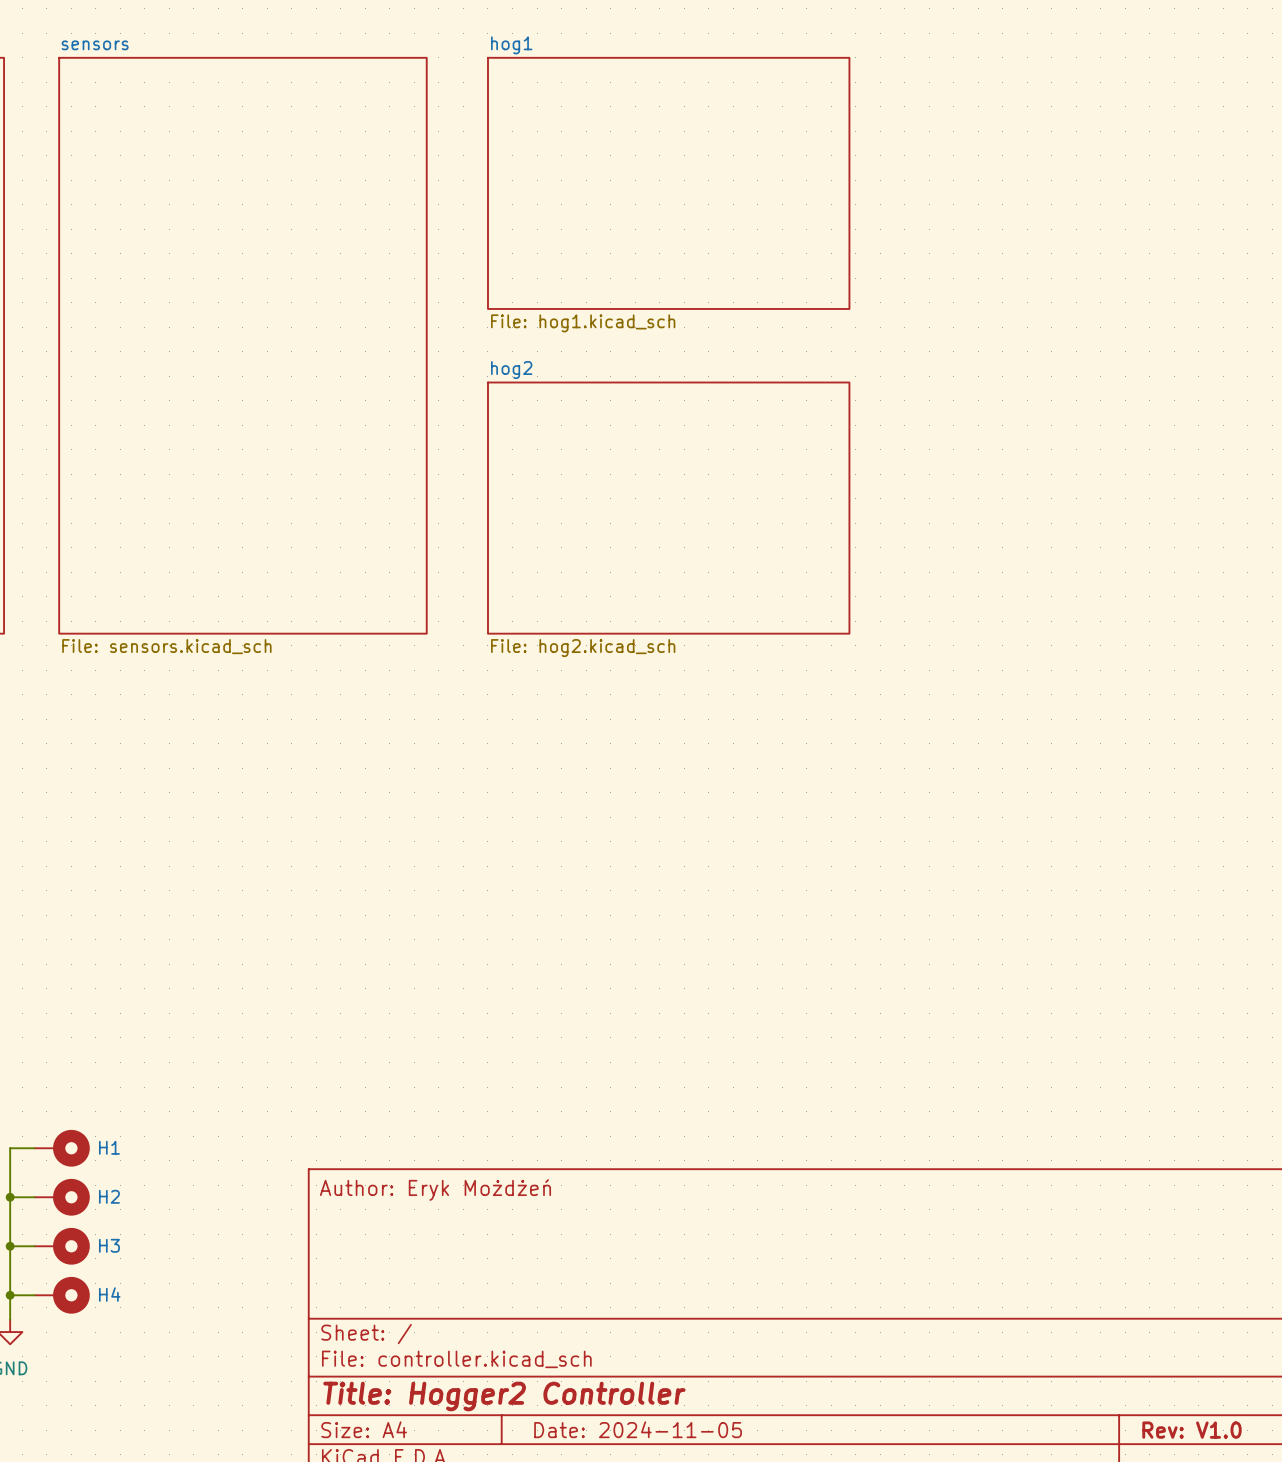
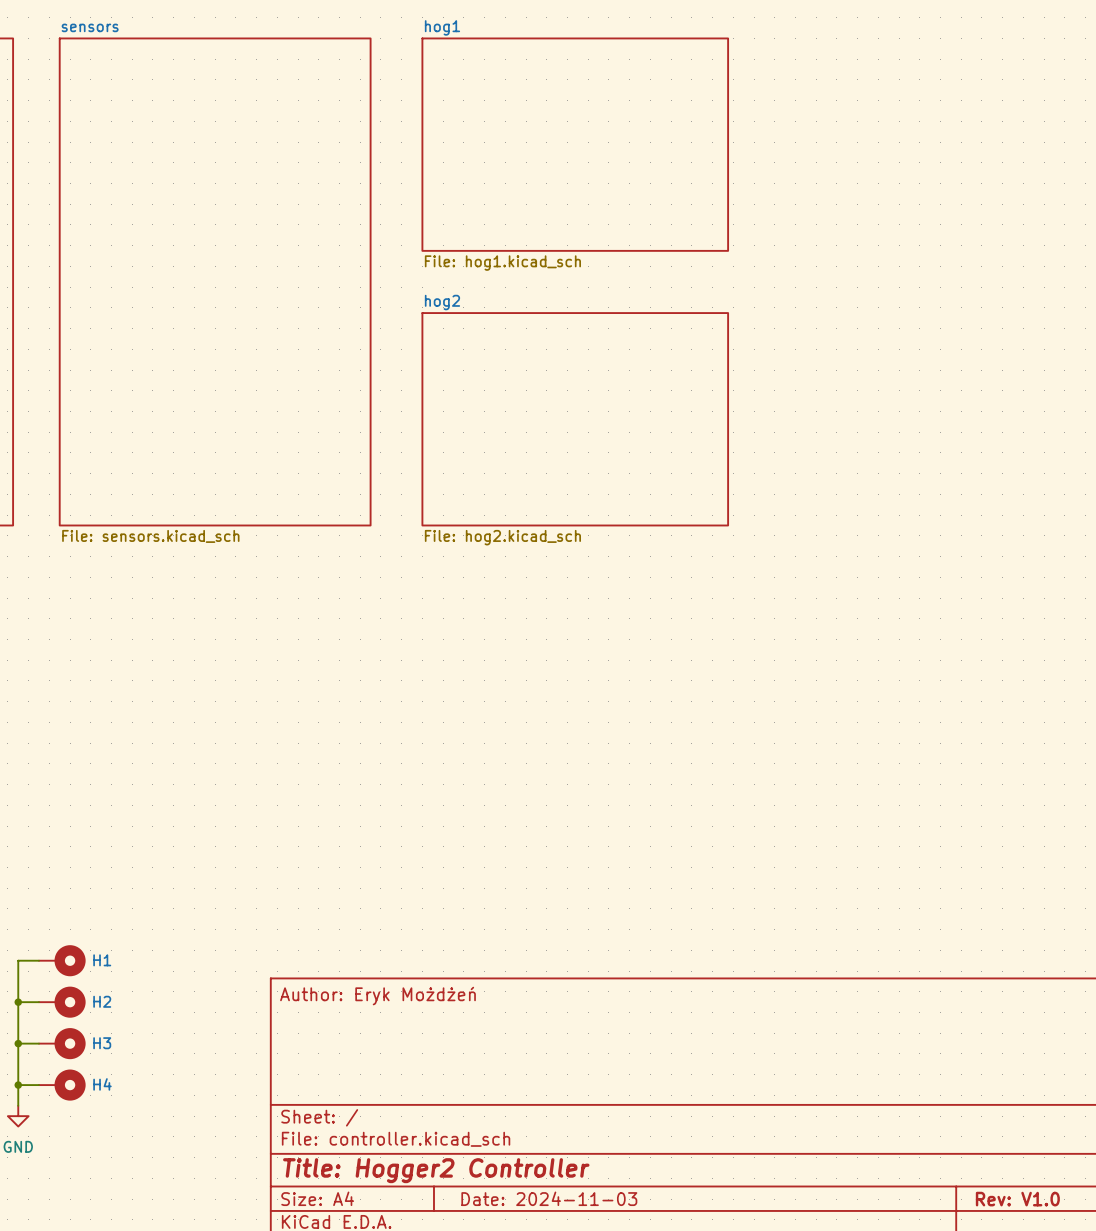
title block: Date: 2024-11-05 (638, 1429) -> Date: 2024-11-03 (549, 1198)

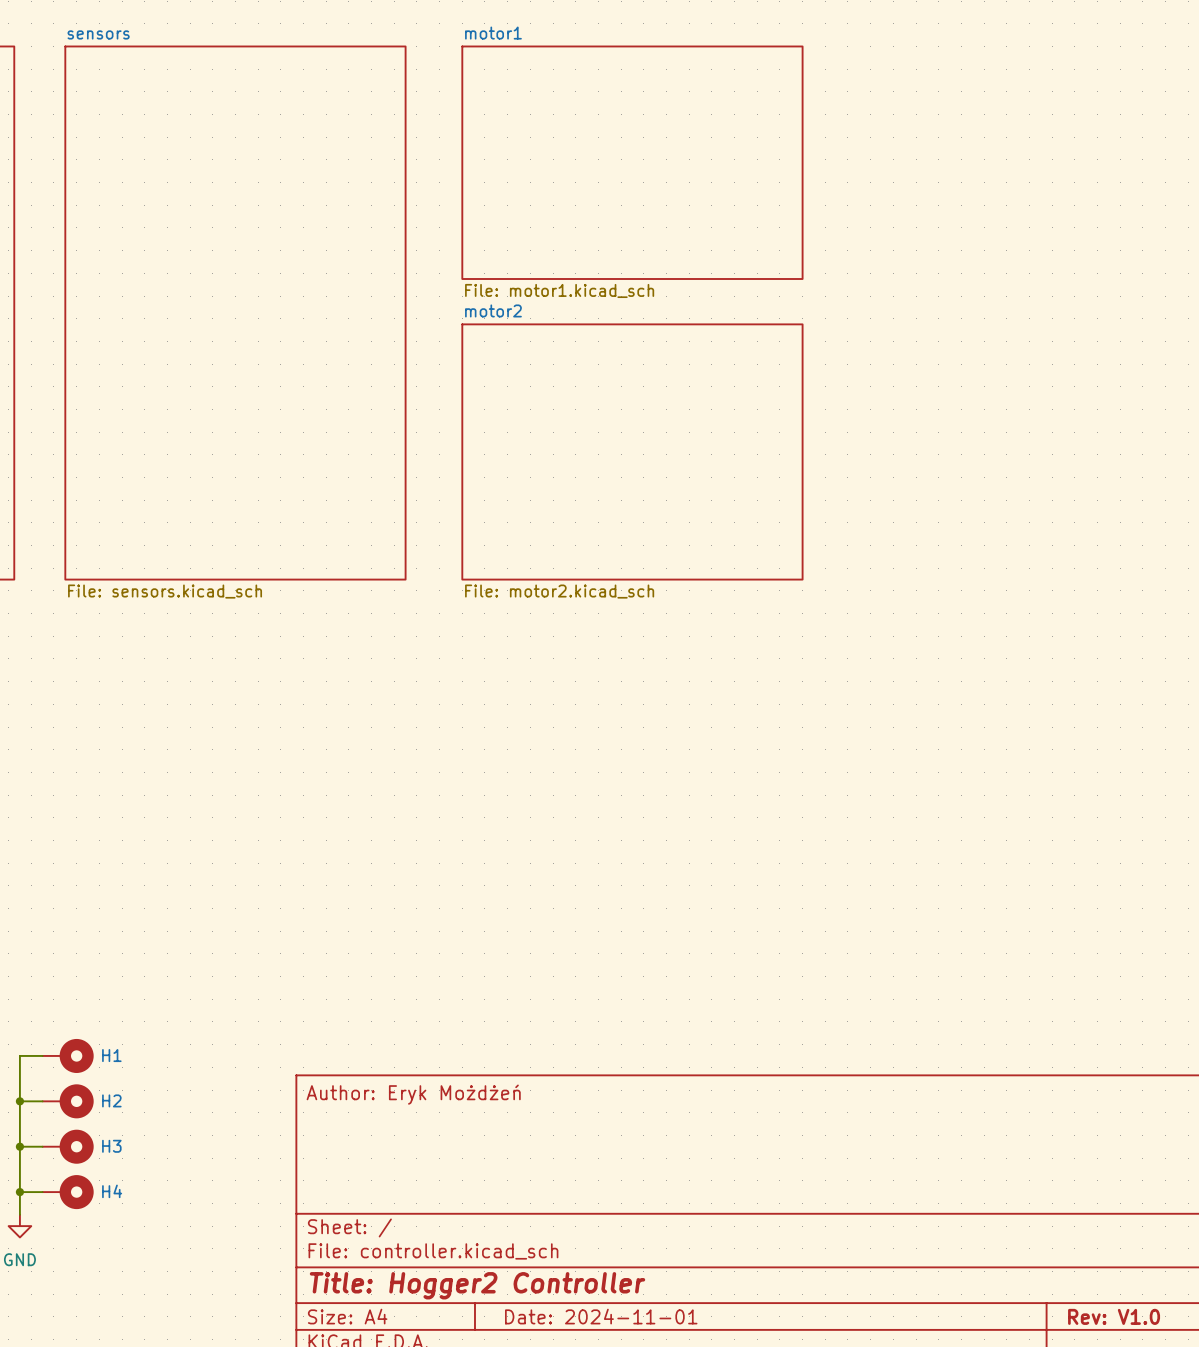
sheet hog1: File: hog1.kicad_sch (575, 144) -> none
sheet motor1: none -> File: motor1.kicad_sch (632, 162)
sheet motor2: none -> File: motor2.kicad_sch (632, 451)
sheet hog2: File: hog2.kicad_sch (575, 419) -> none
title block: Date: 2024-11-03 (549, 1198) -> Date: 2024-11-01 (601, 1316)

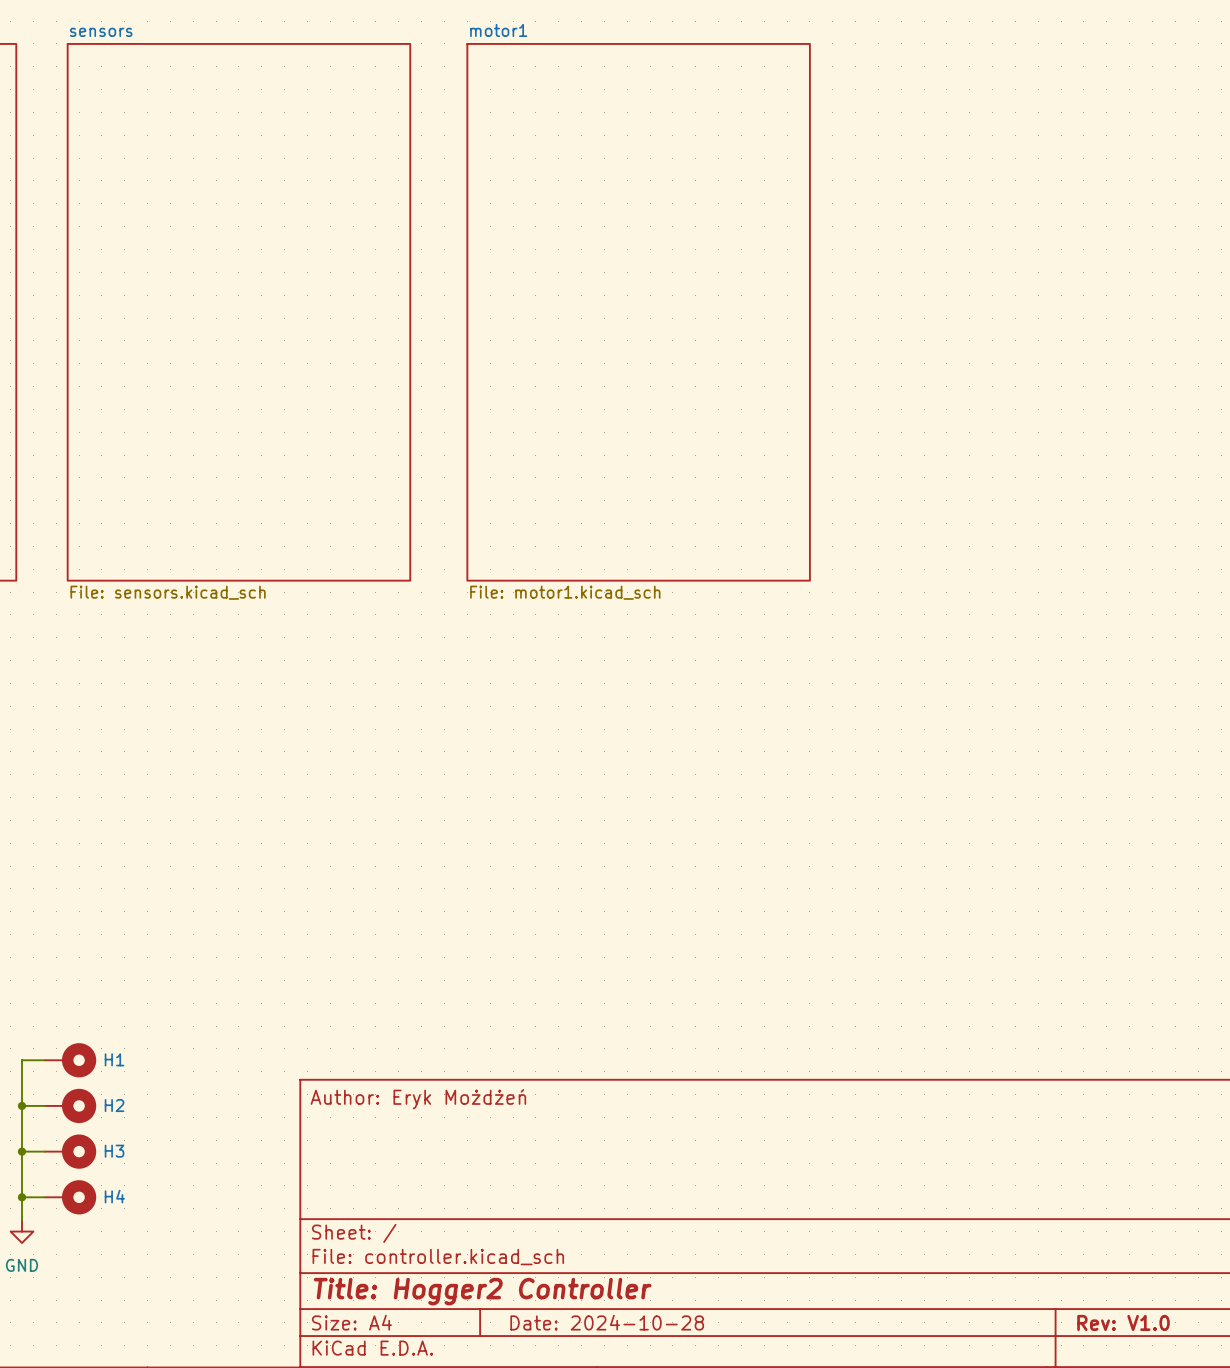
sheet motor1 shape: [461, 45, 804, 280] -> [466, 43, 811, 582]
sheet motor1 value position: File: motor1.kicad_sch (559, 290) -> File: motor1.kicad_sch (565, 592)
sheet motor2: File: motor2.kicad_sch (632, 451) -> none
title block: Date: 2024-11-01 (601, 1316) -> Date: 2024-10-28 (607, 1322)

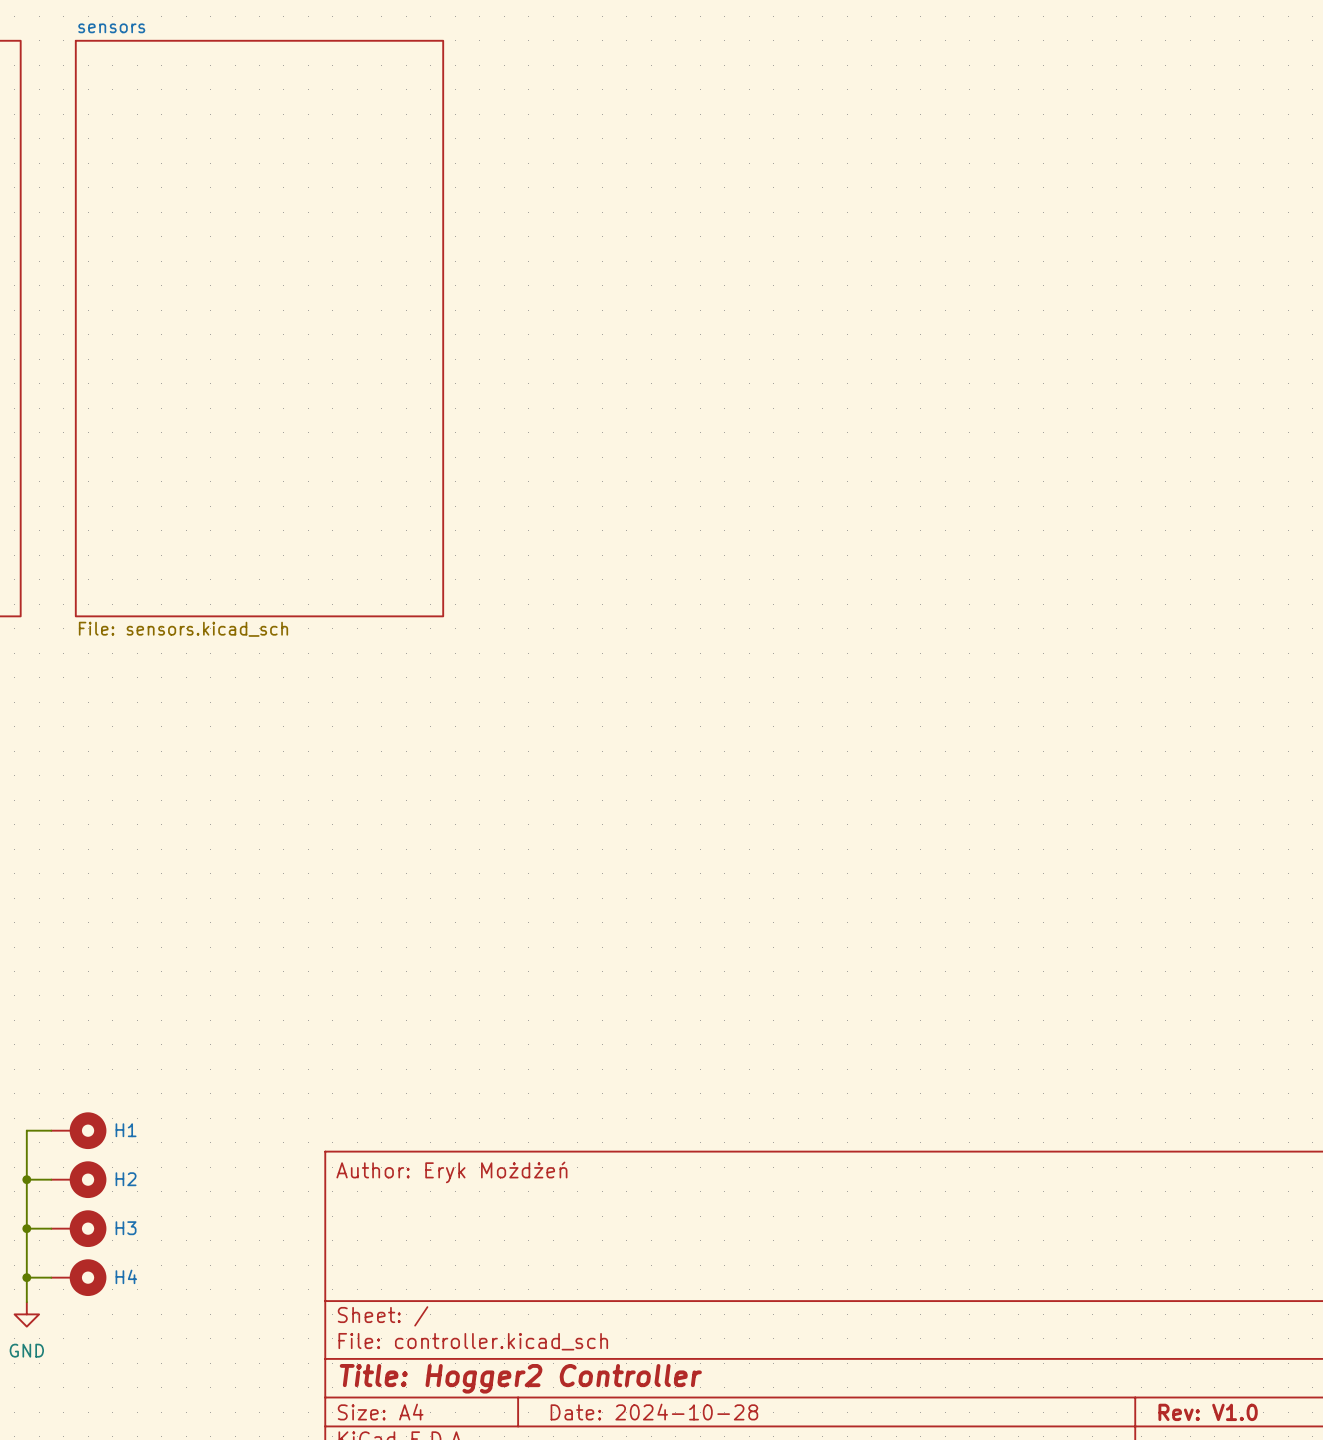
sheet motor1: File: motor1.kicad_sch (638, 312) -> none

